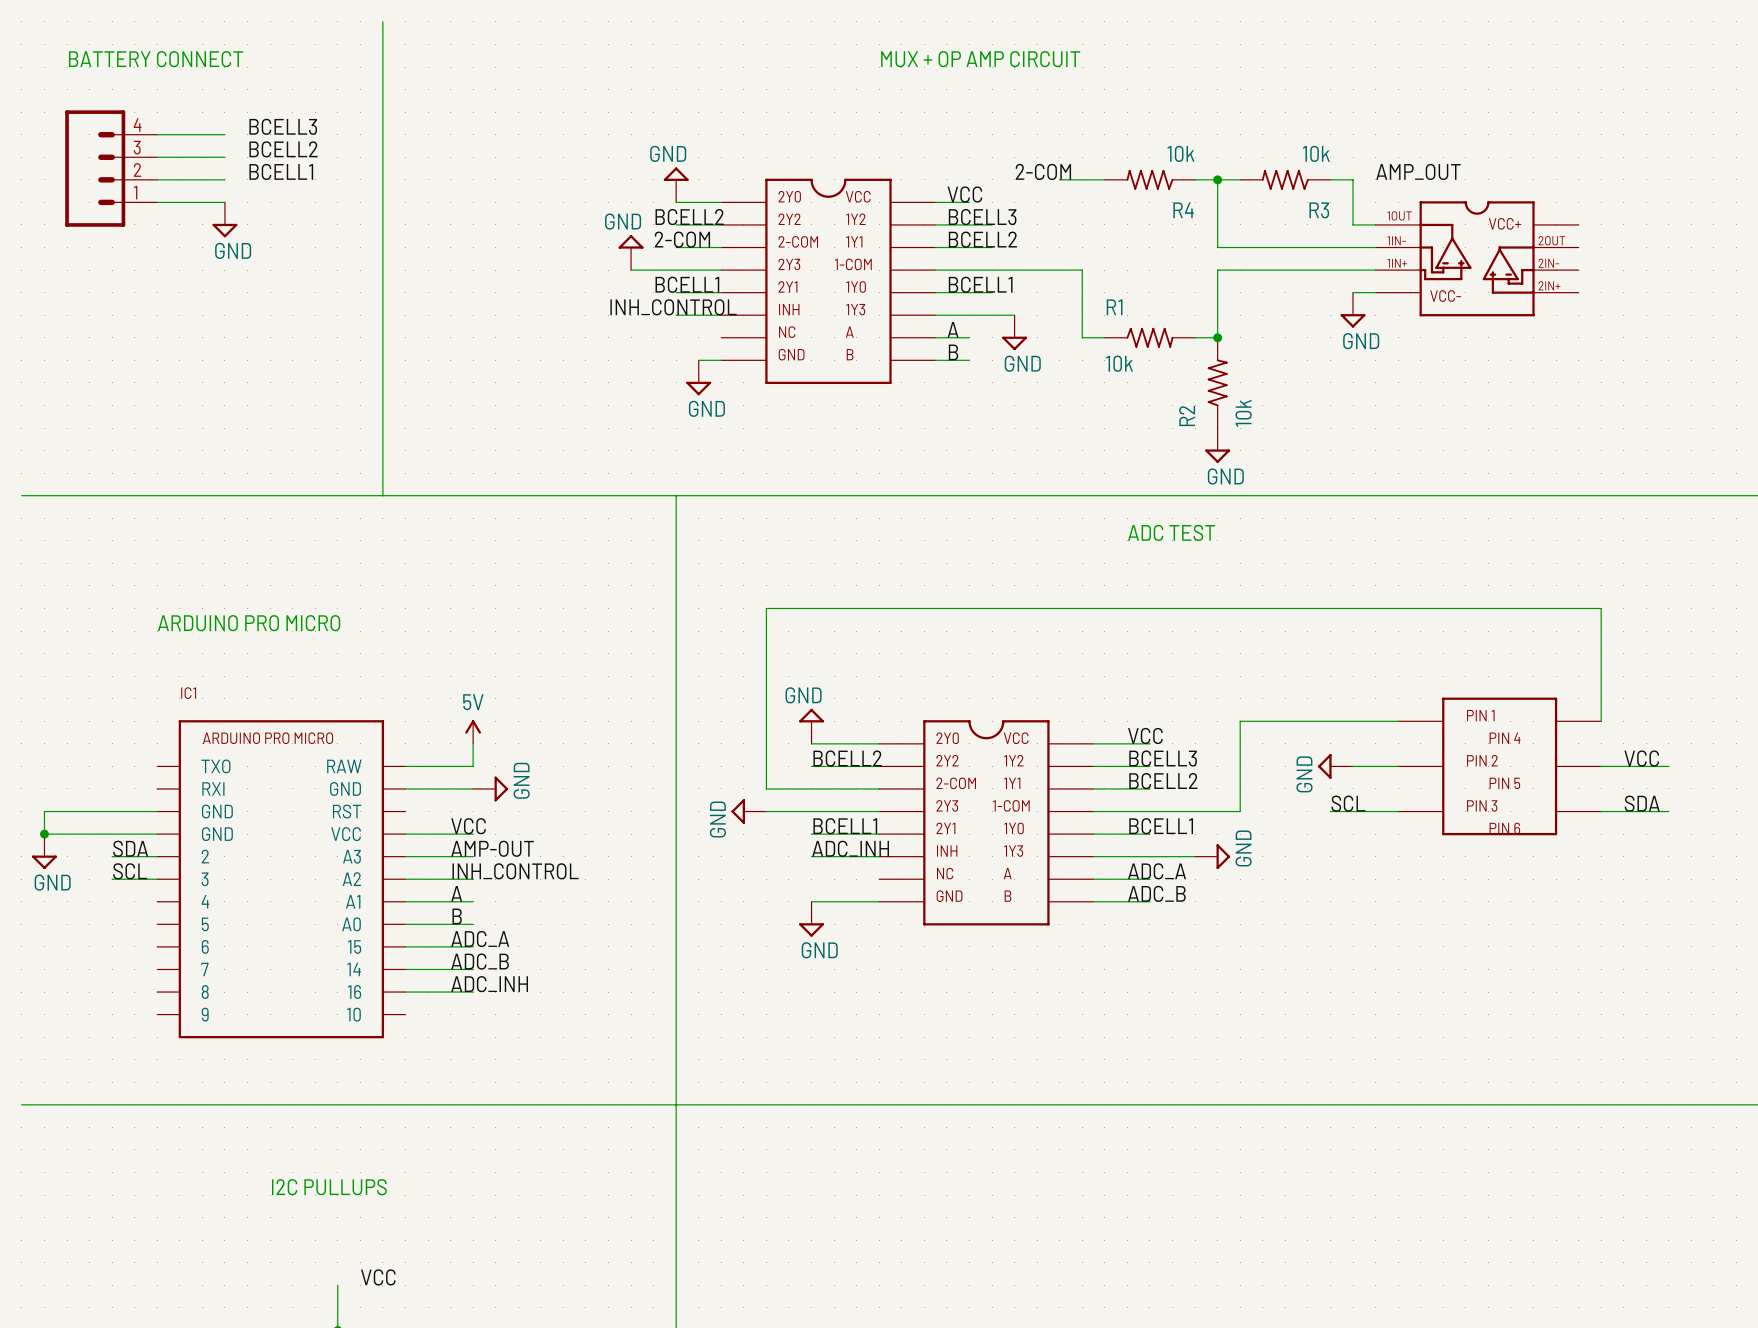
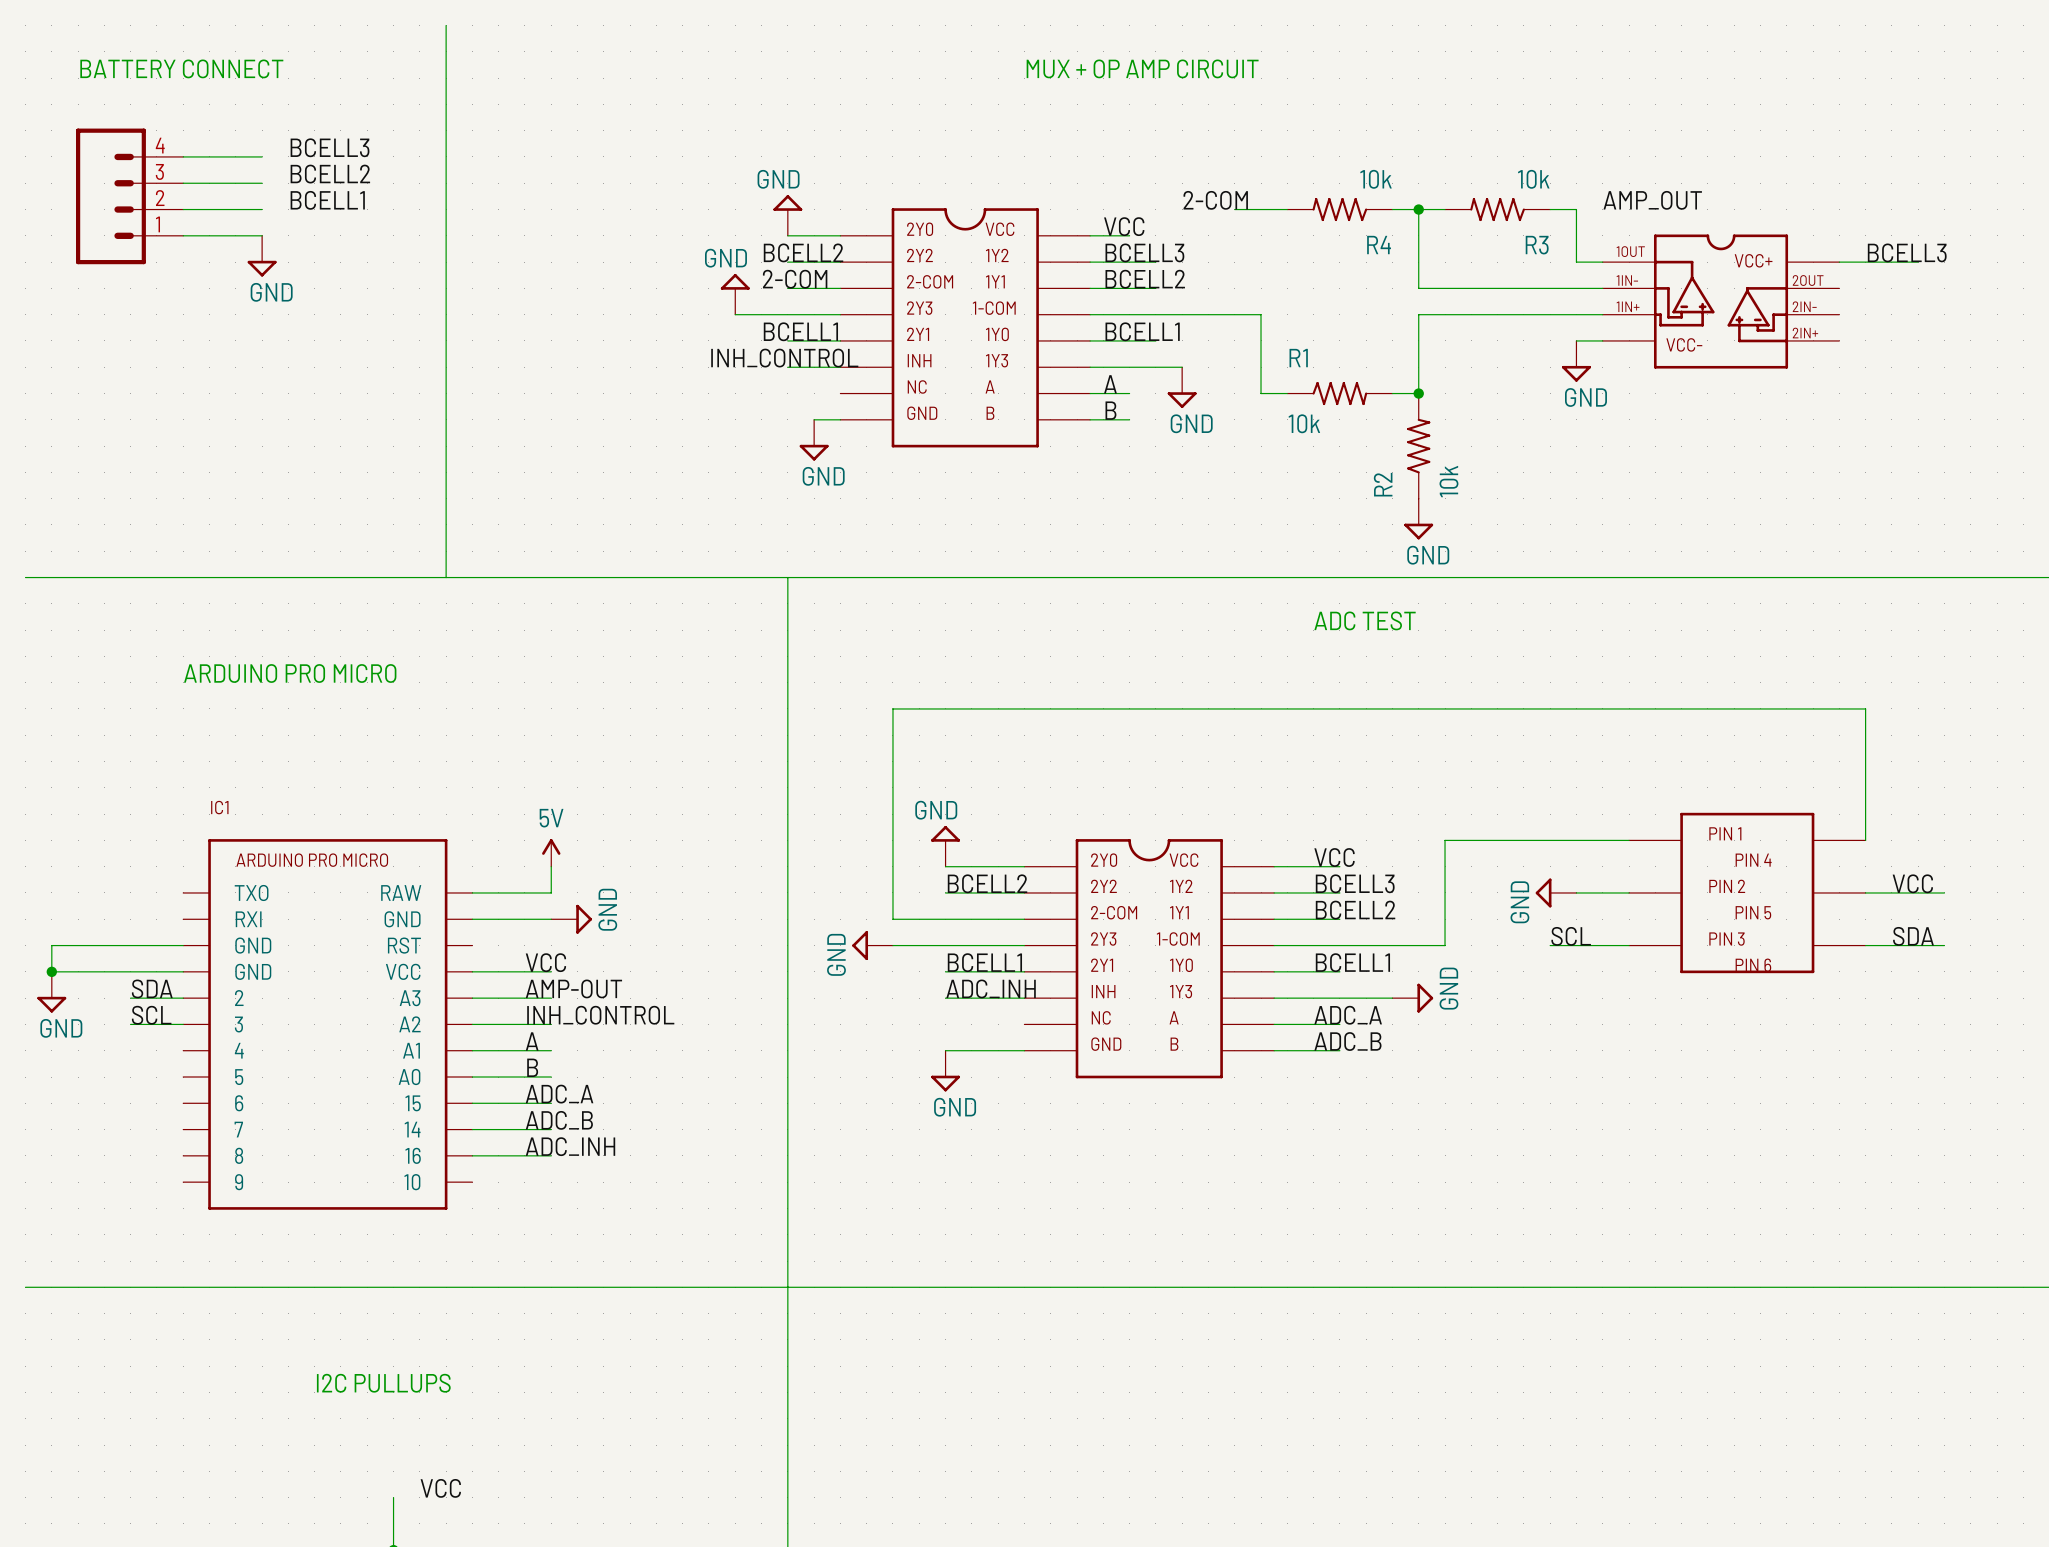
label: none -> BCELL3 (1907, 252)
wire: none -> (1839, 262) (1918, 262)
text position: ARDUINO PRO MICRO (249, 623) -> ARDUINO PRO MICRO (290, 673)

